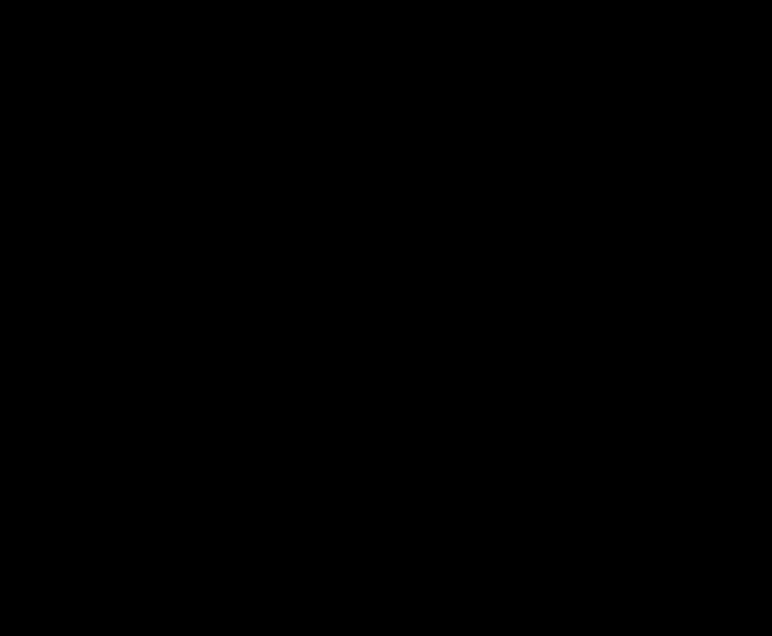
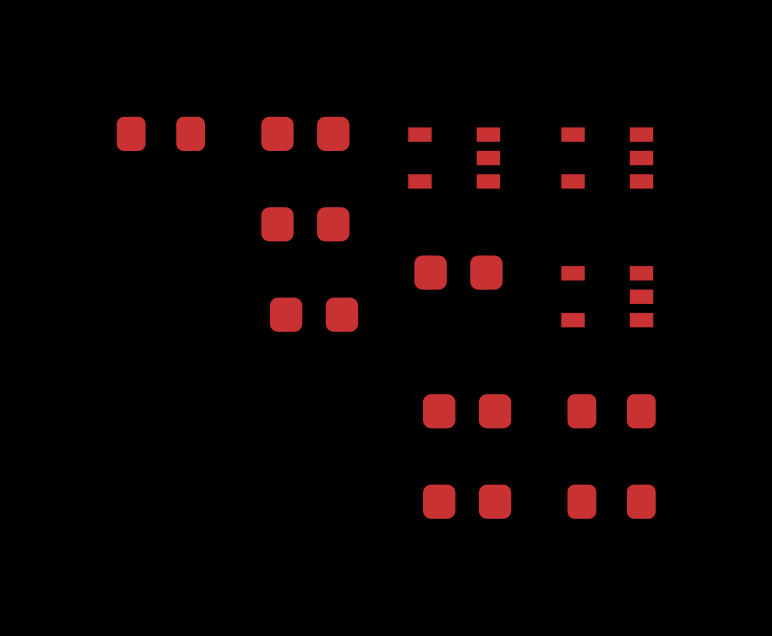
part: none -> (160, 133)
part: none -> (305, 133)
part: none -> (454, 158)
part: none -> (607, 158)
part: none -> (305, 224)
part: none -> (458, 272)
part: none -> (607, 296)
part: none -> (314, 314)
part: none -> (467, 411)
part: none -> (611, 411)
part: none -> (467, 501)
part: none -> (611, 501)

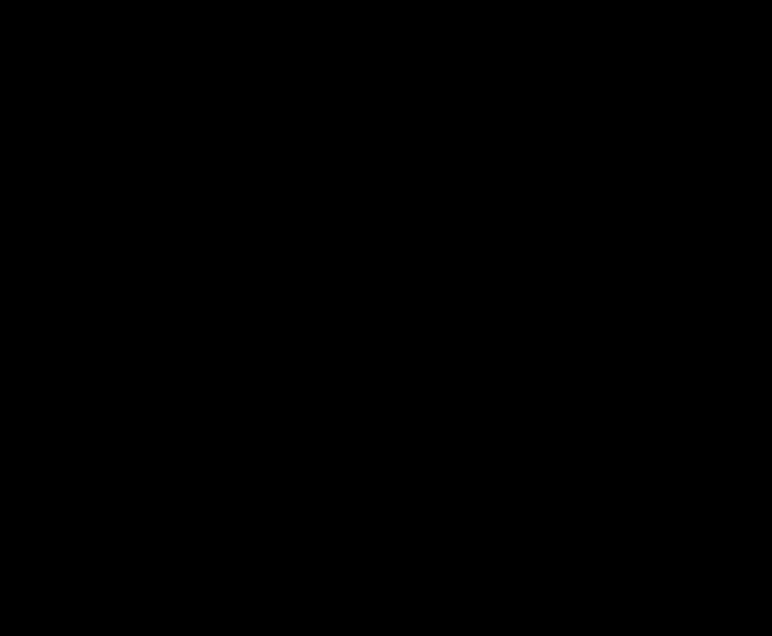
part: (160, 133) -> none
part: (305, 133) -> none
part: (454, 158) -> none
part: (607, 158) -> none
part: (305, 224) -> none
part: (458, 272) -> none
part: (607, 296) -> none
part: (314, 314) -> none
part: (467, 411) -> none
part: (611, 411) -> none
part: (467, 501) -> none
part: (611, 501) -> none

